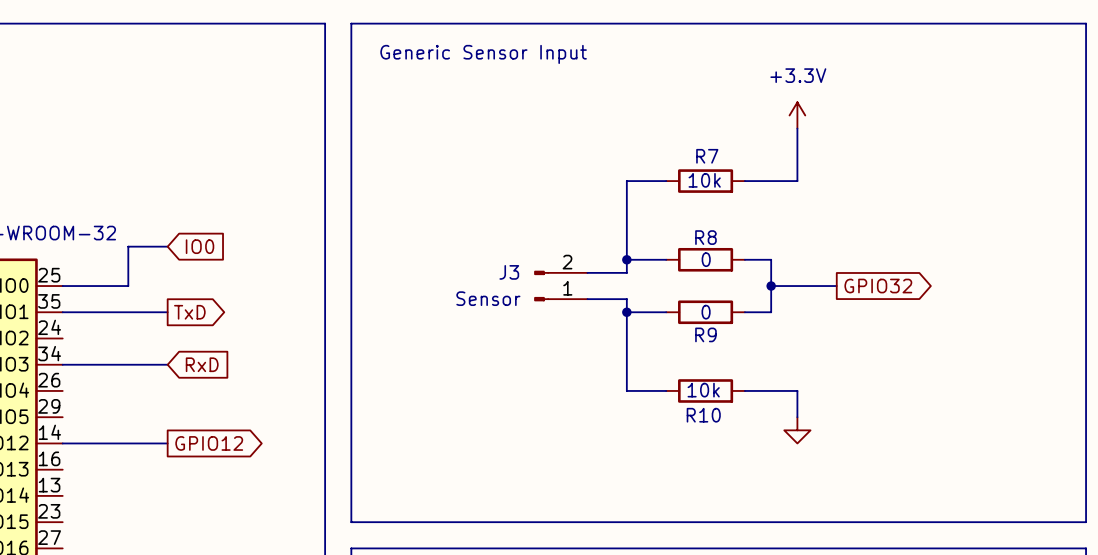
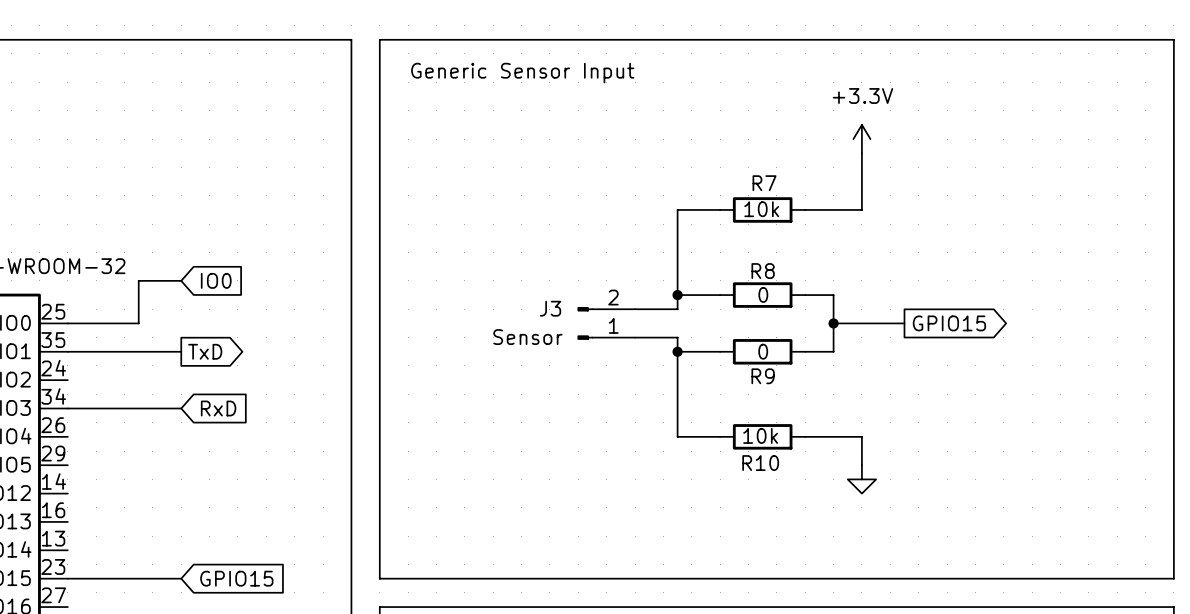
global label: GPIO32 (878, 286) -> GPIO15 (949, 323)
wire: (62, 443) (167, 443) -> (67, 578) (181, 578)
global label: GPIO12 (209, 443) -> none
global label: none -> GPIO15 (236, 578)

